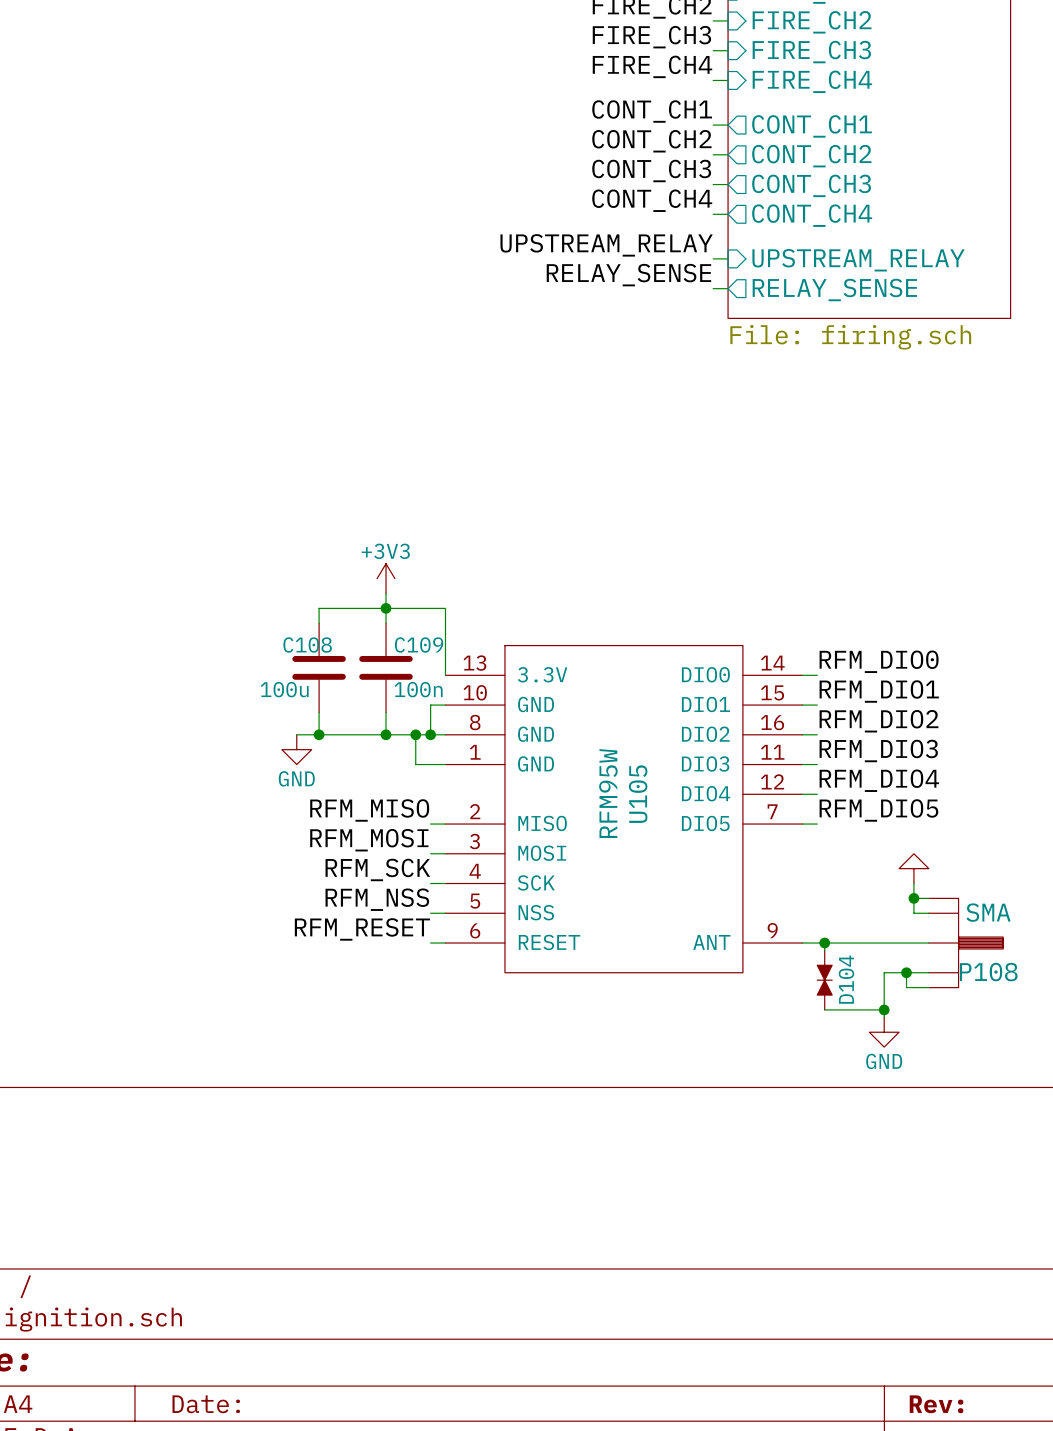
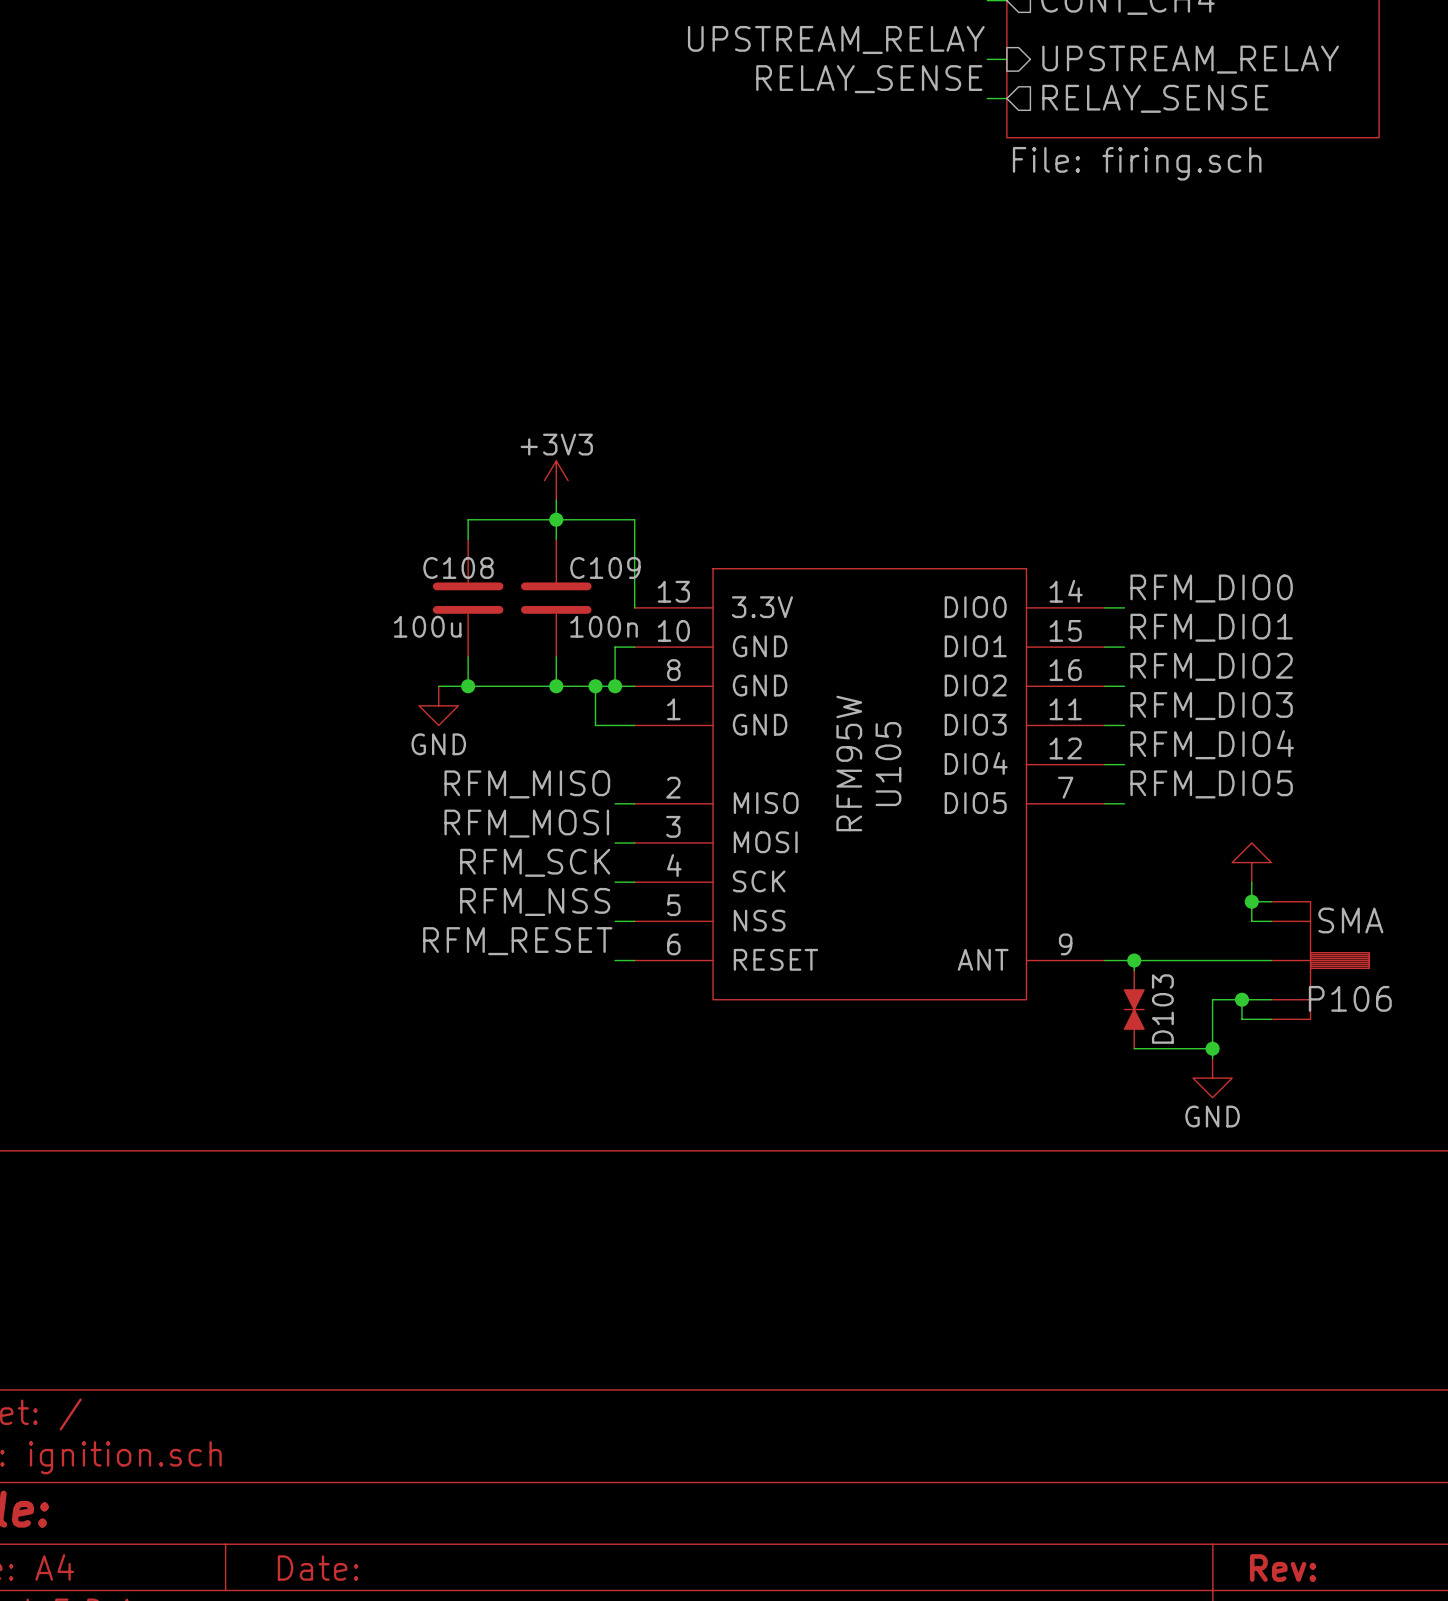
P108 name: P108 (988, 972) -> P106 (1350, 998)
D104 name: D104 (846, 979) -> D103 (1162, 1009)

